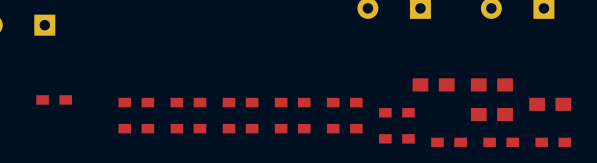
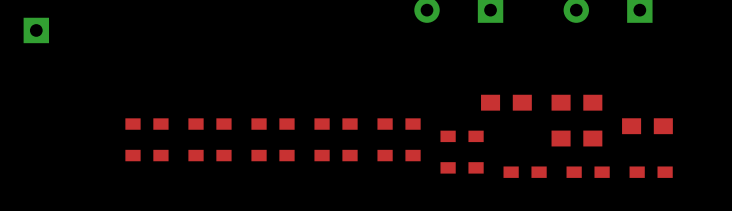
part: (54, 99) -> none

